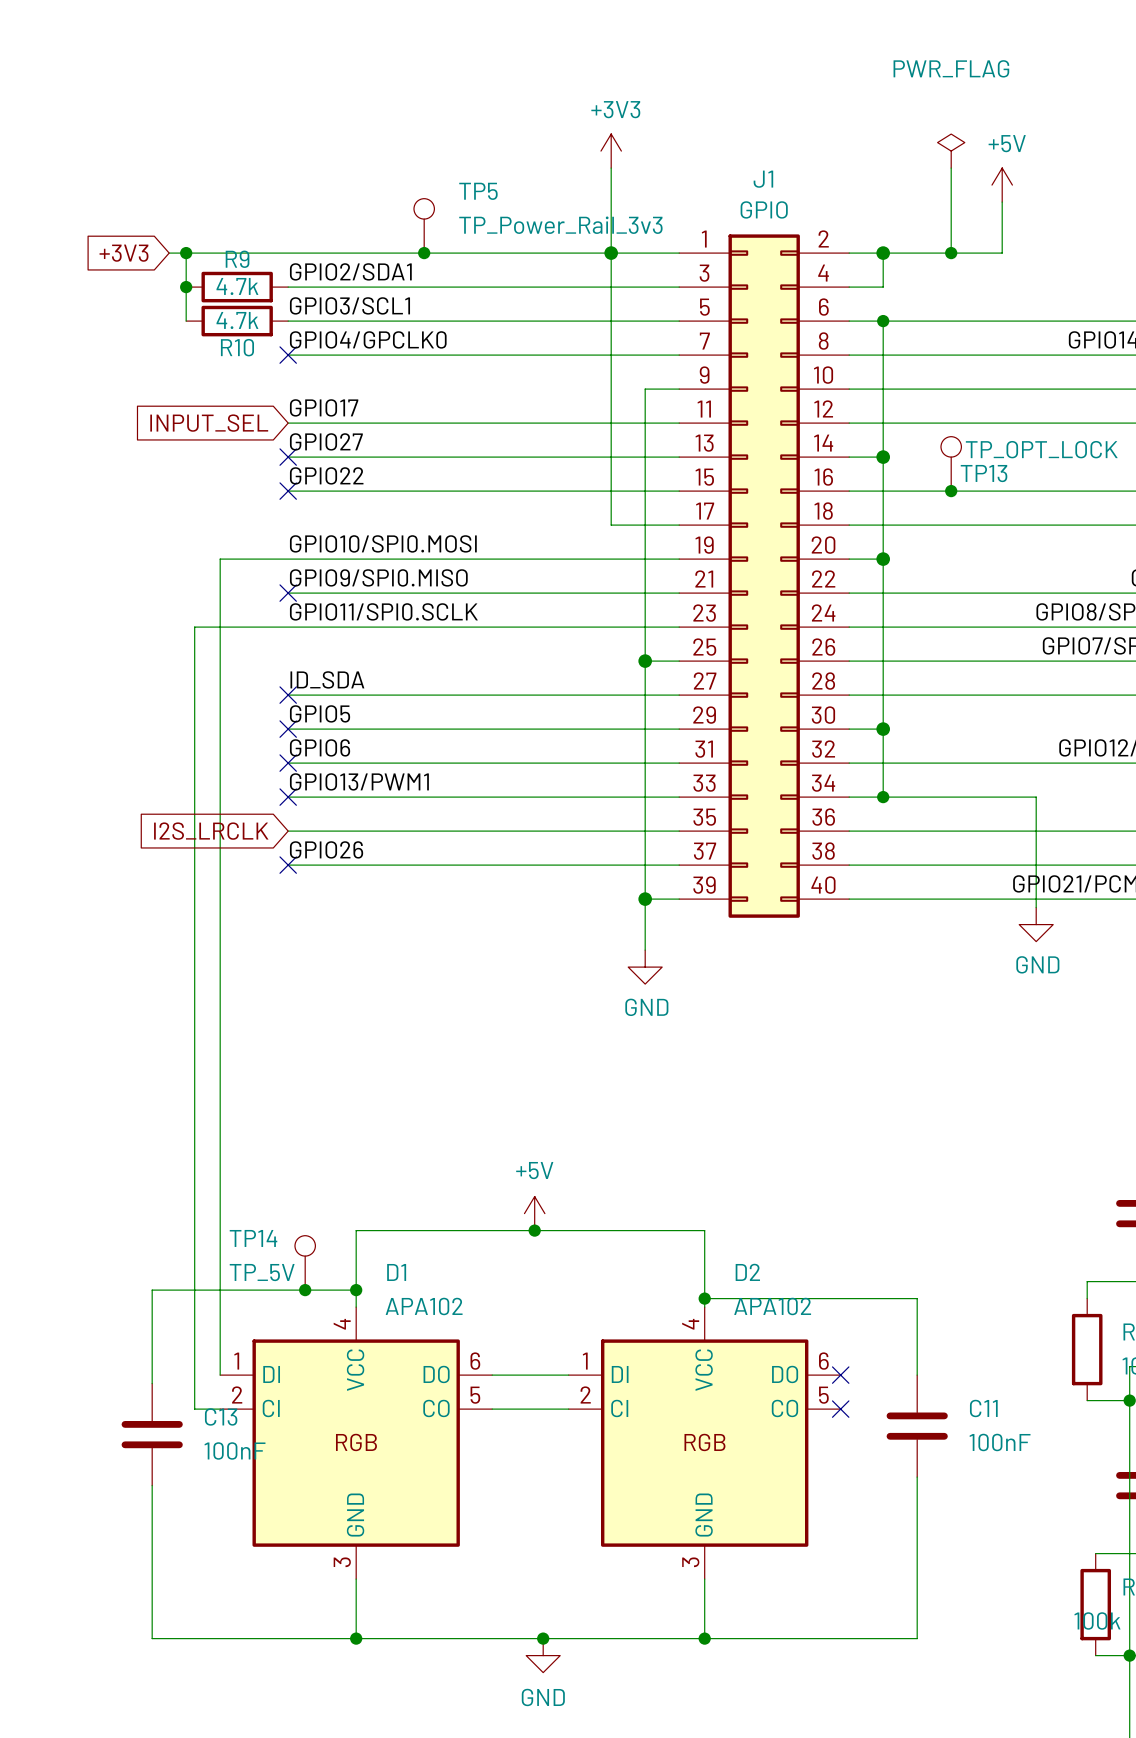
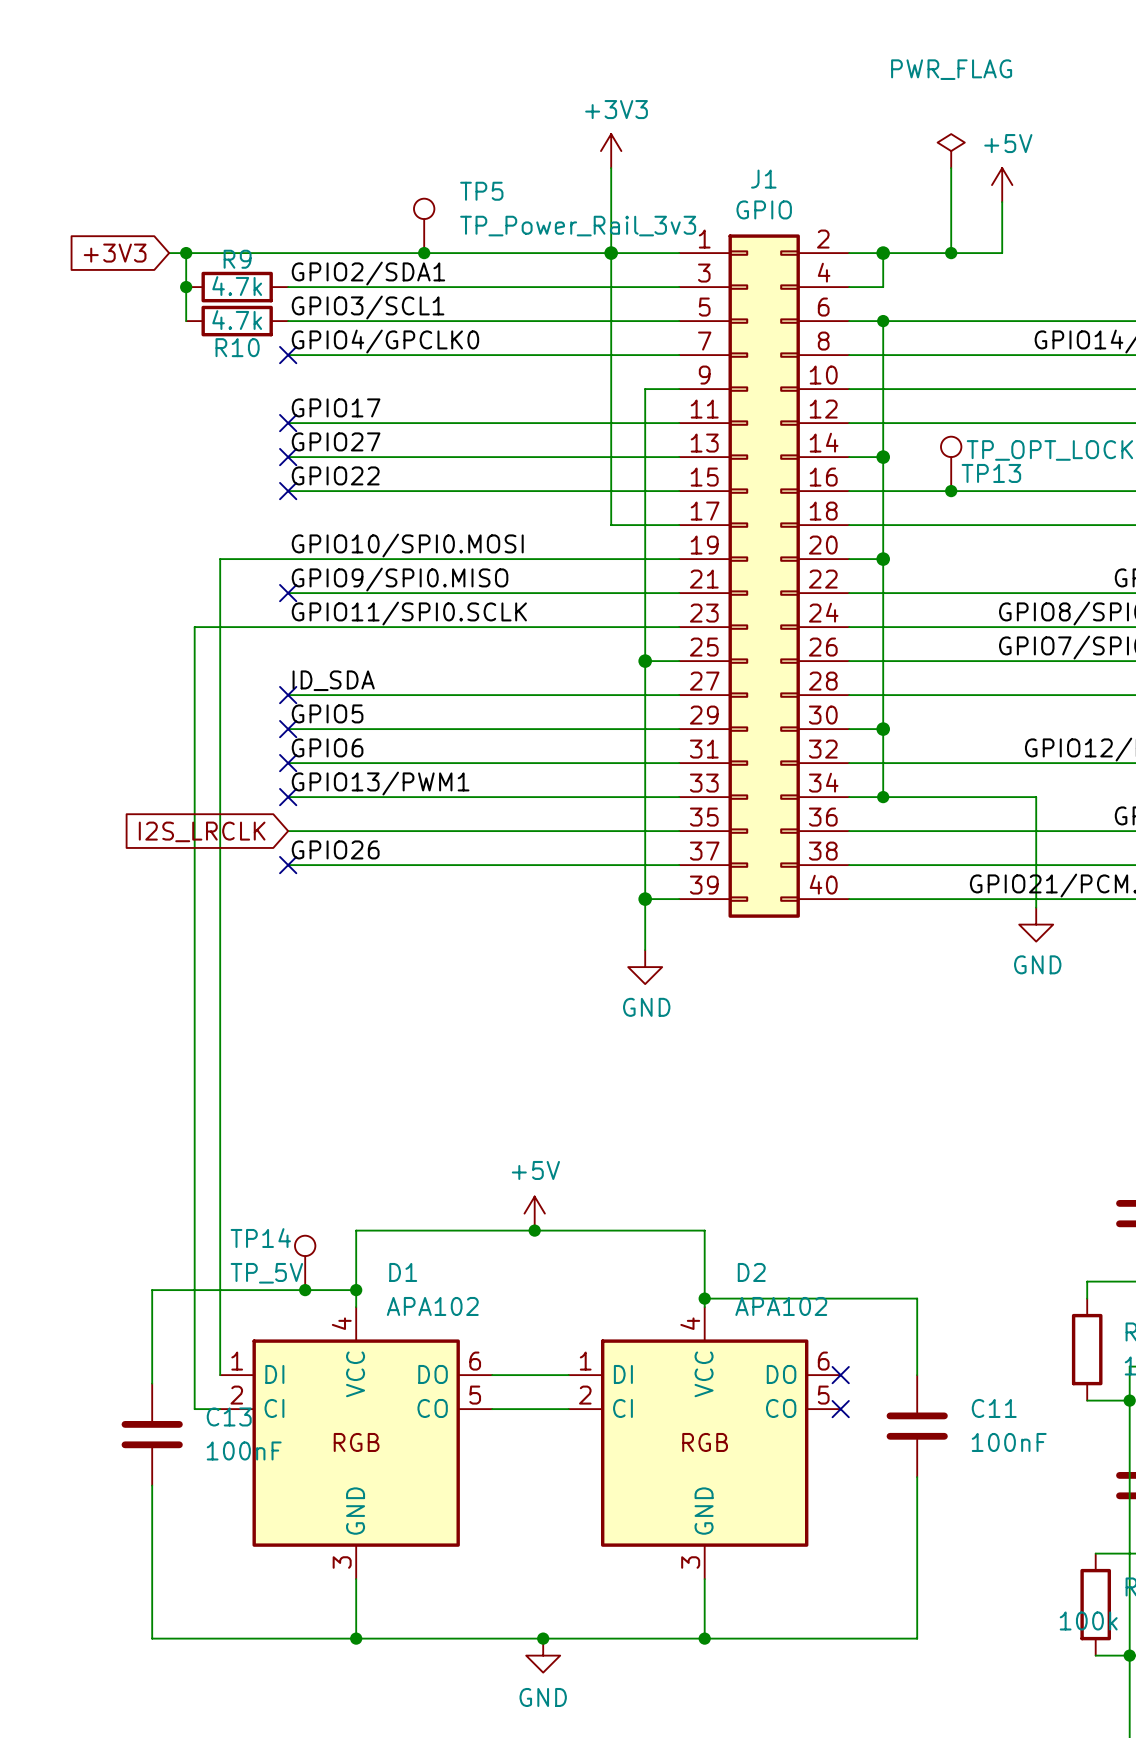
global label: INPUT_SEL (209, 423) -> none
no-connect mark: none -> (288, 423)

